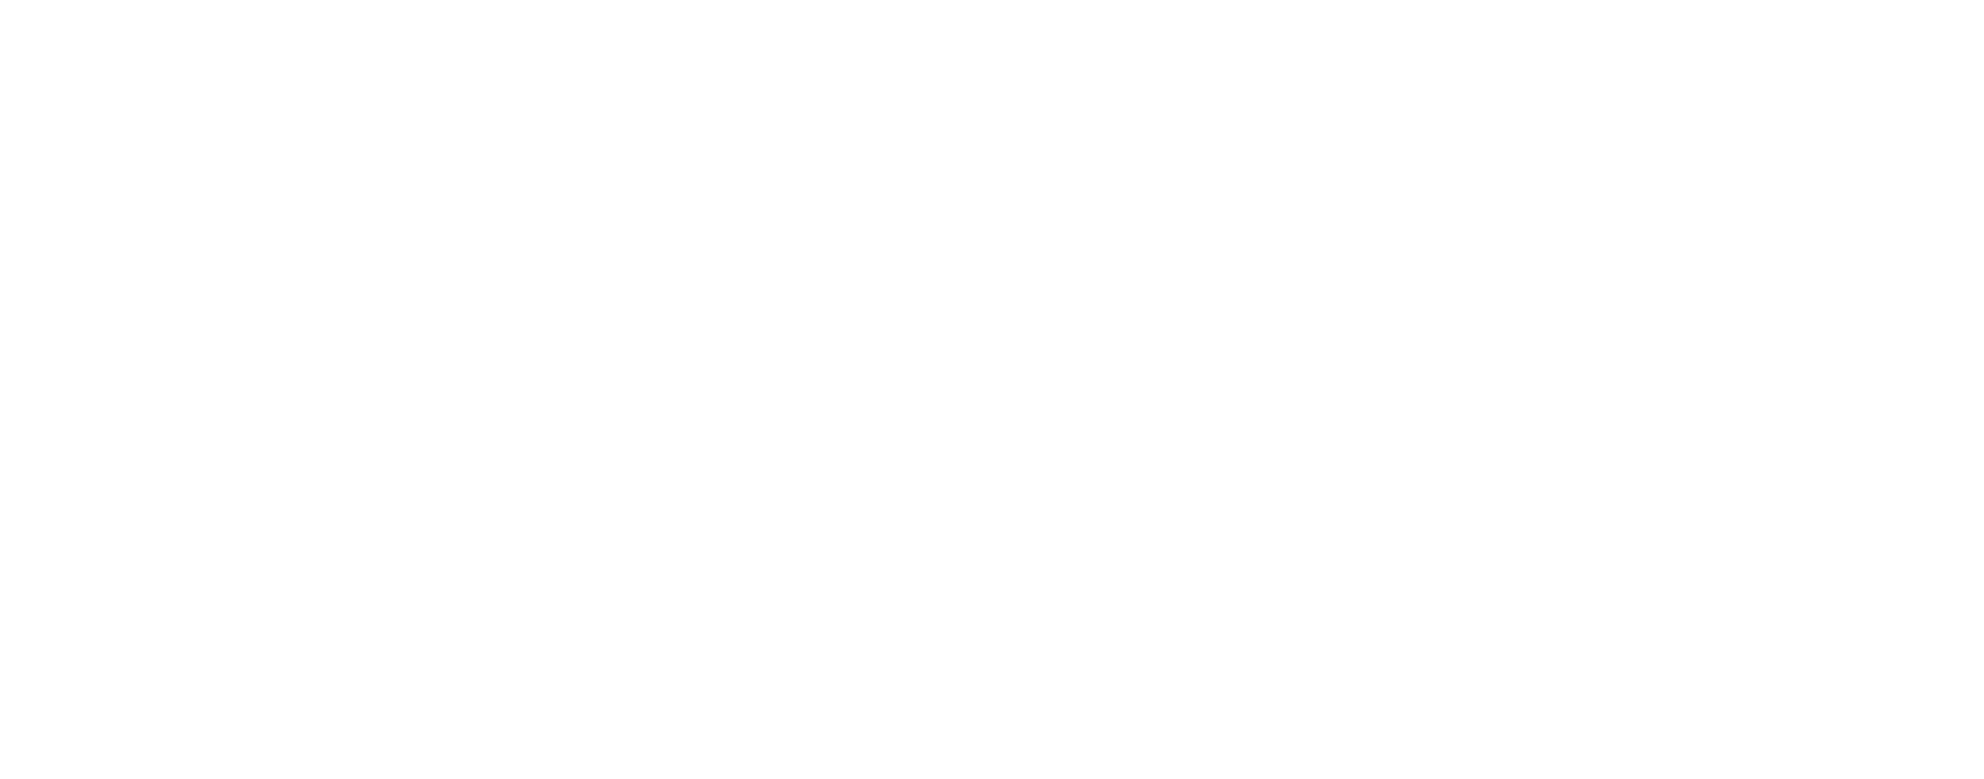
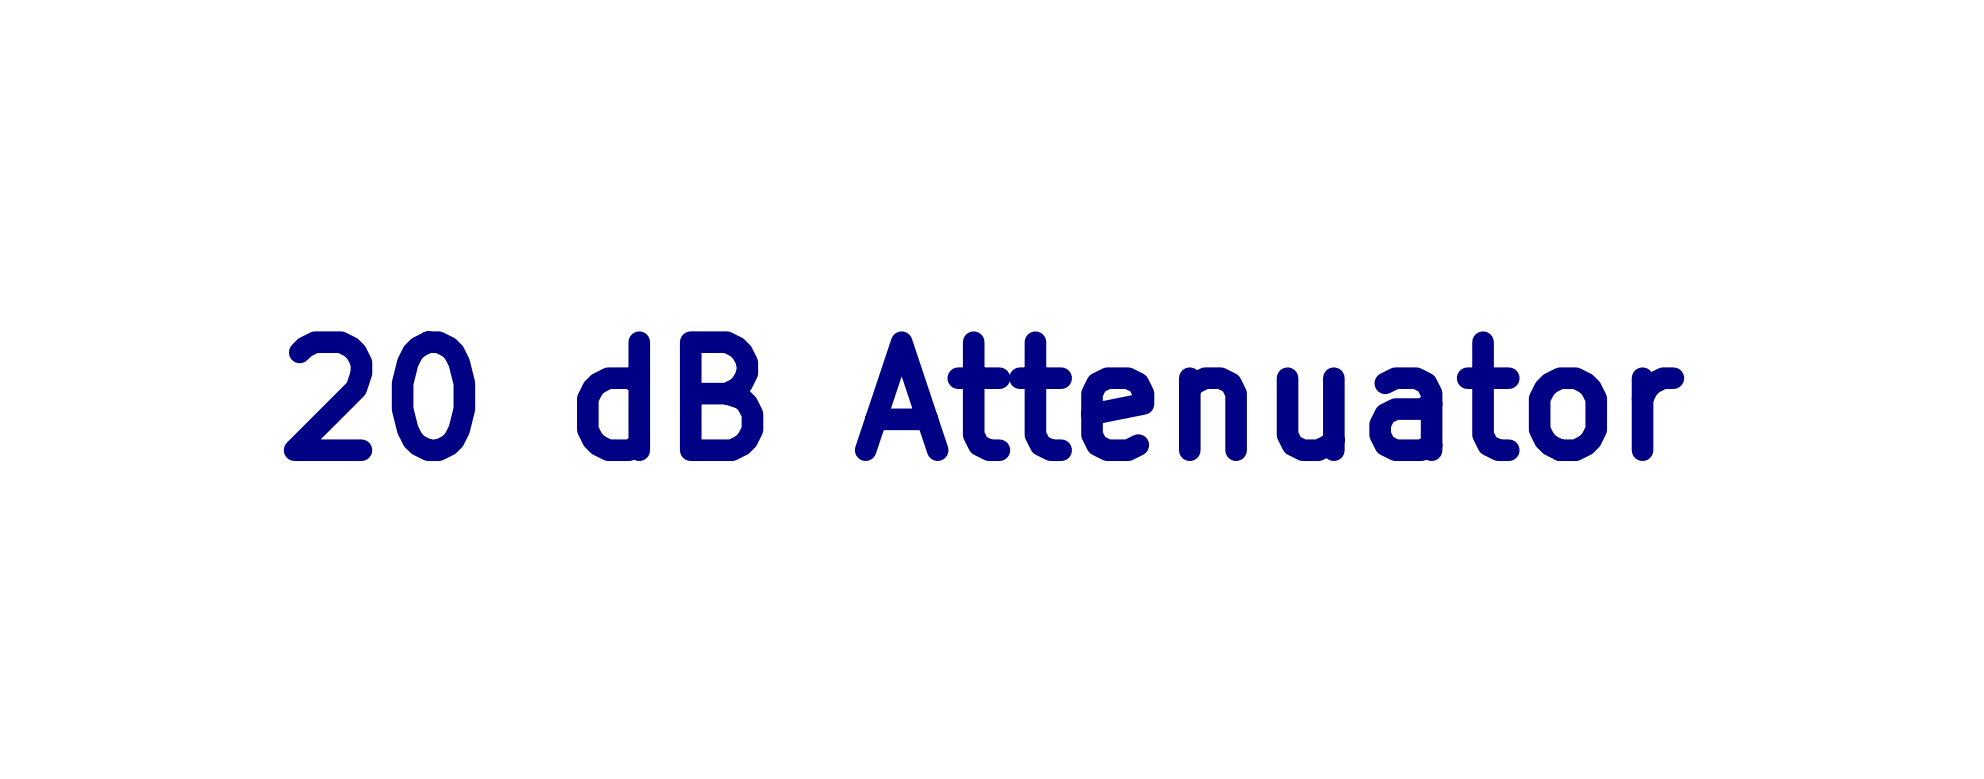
text: none -> 20 dB Attenuator (983, 396)

